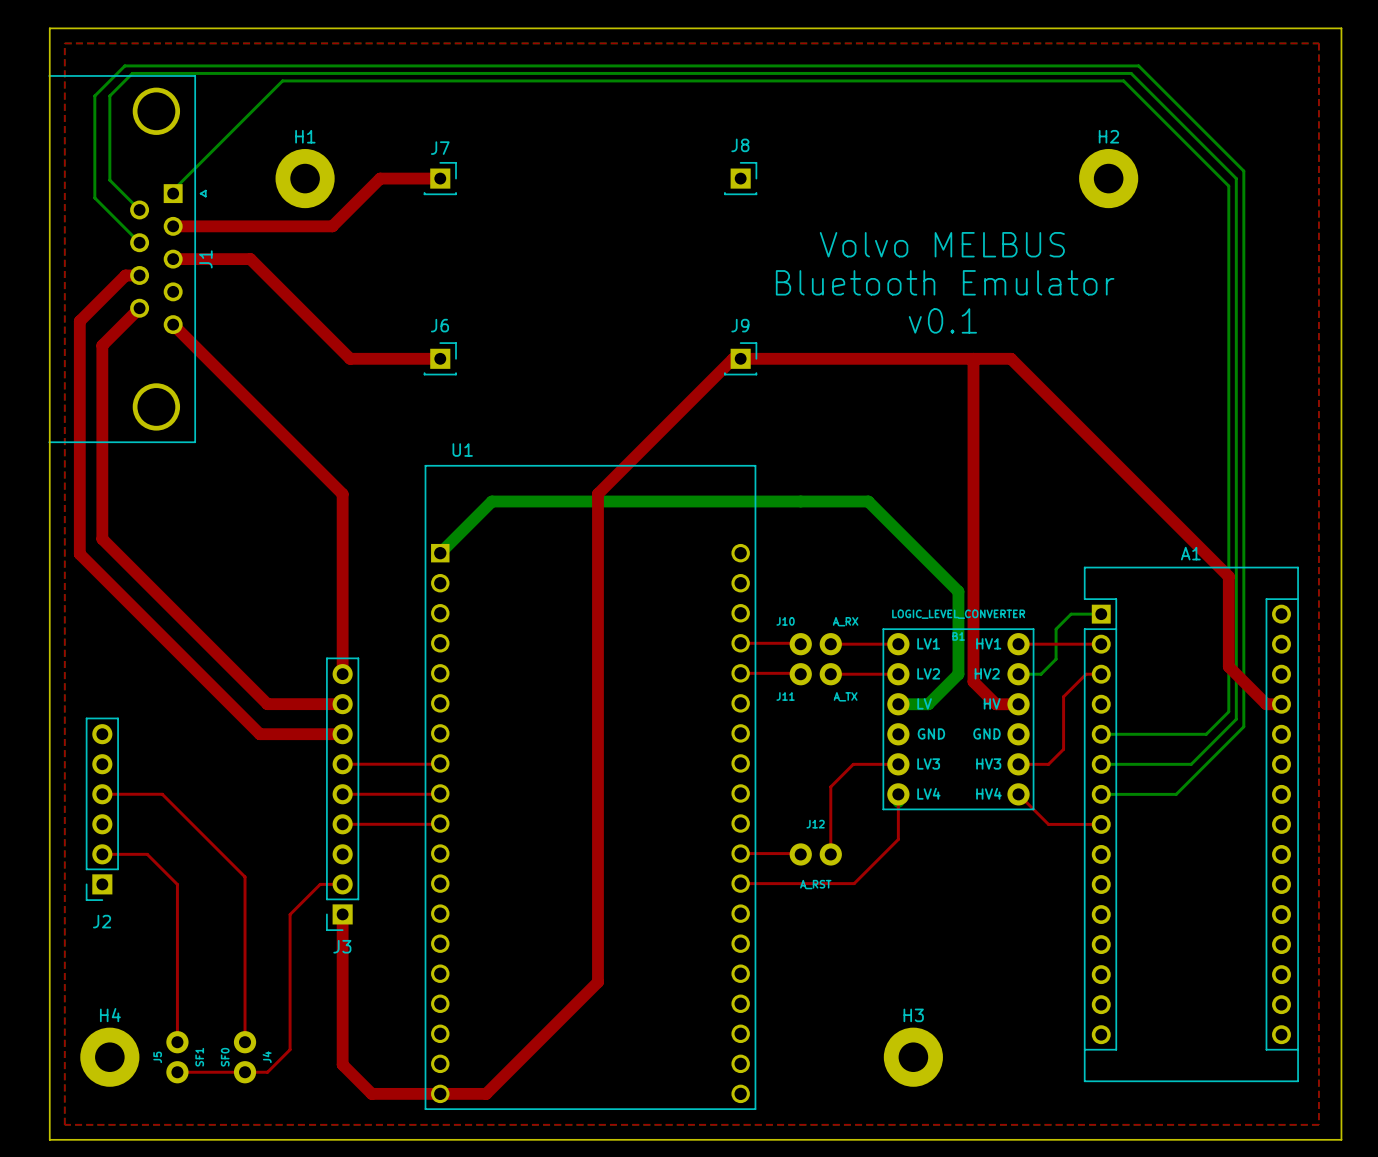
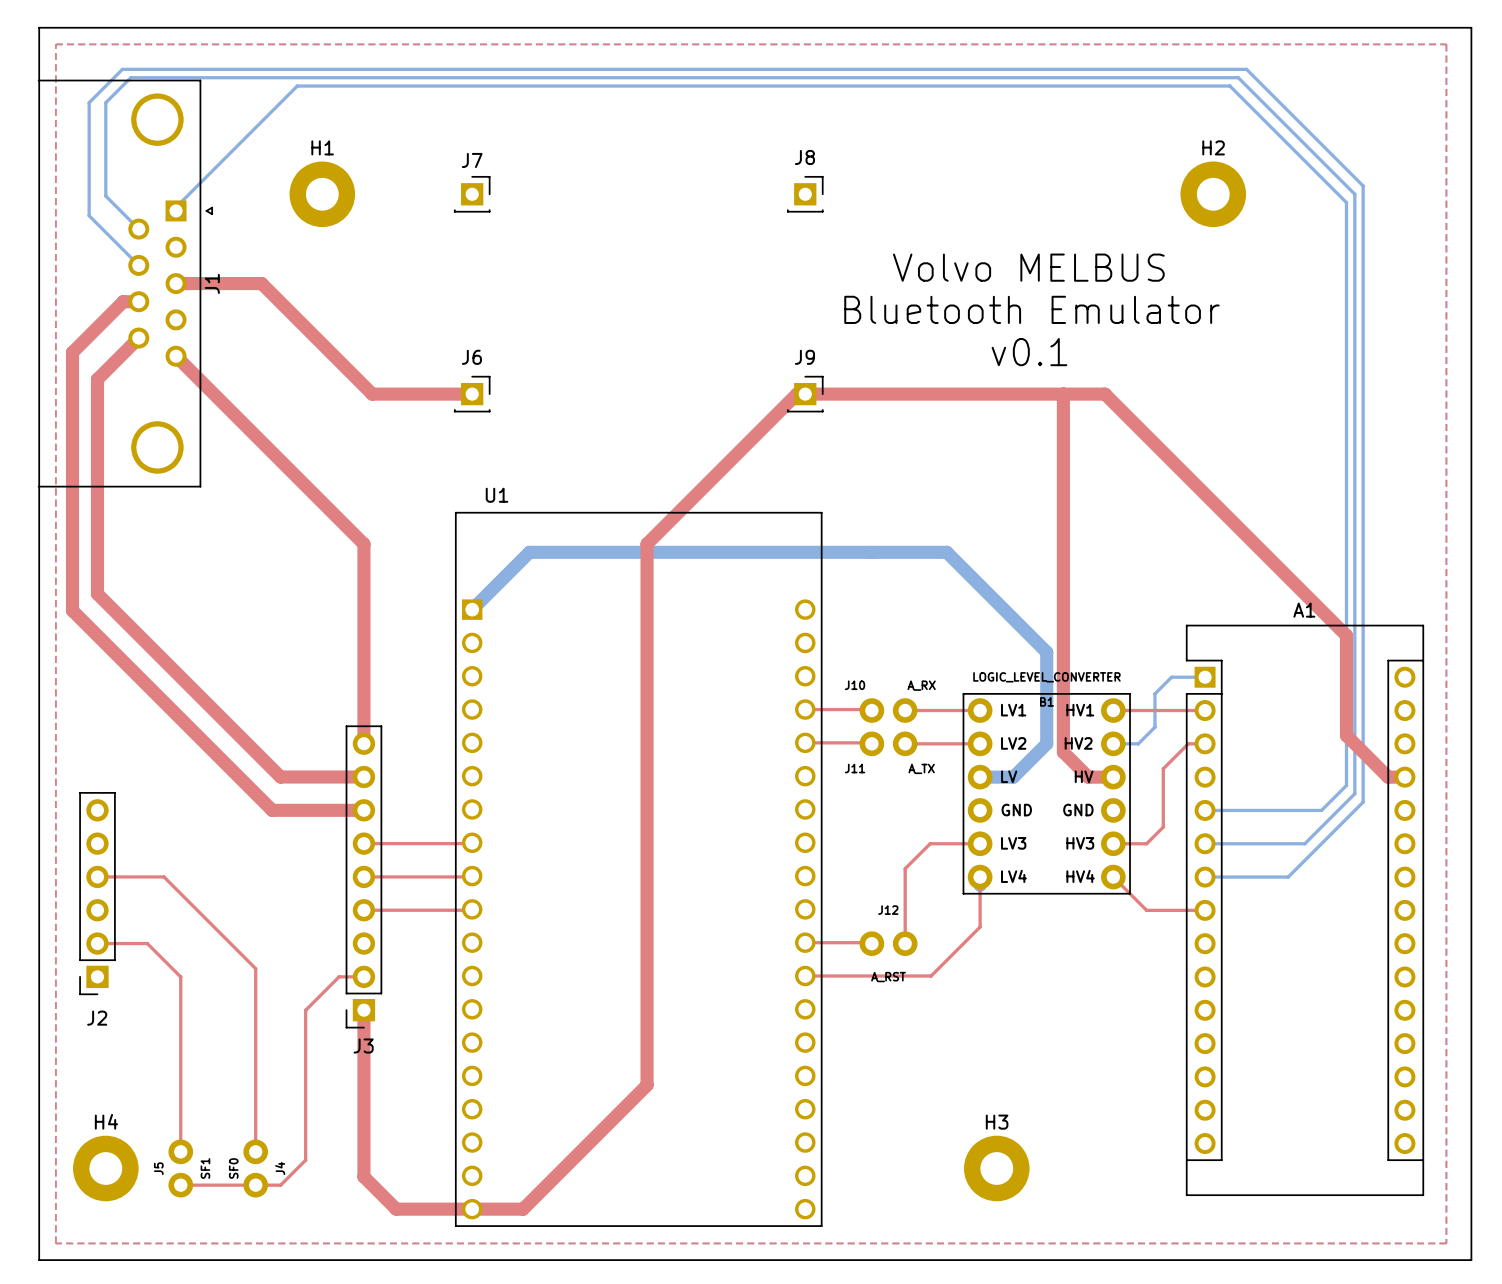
top track: (440, 178) (380, 178) (332, 226) (173, 226) -> none

